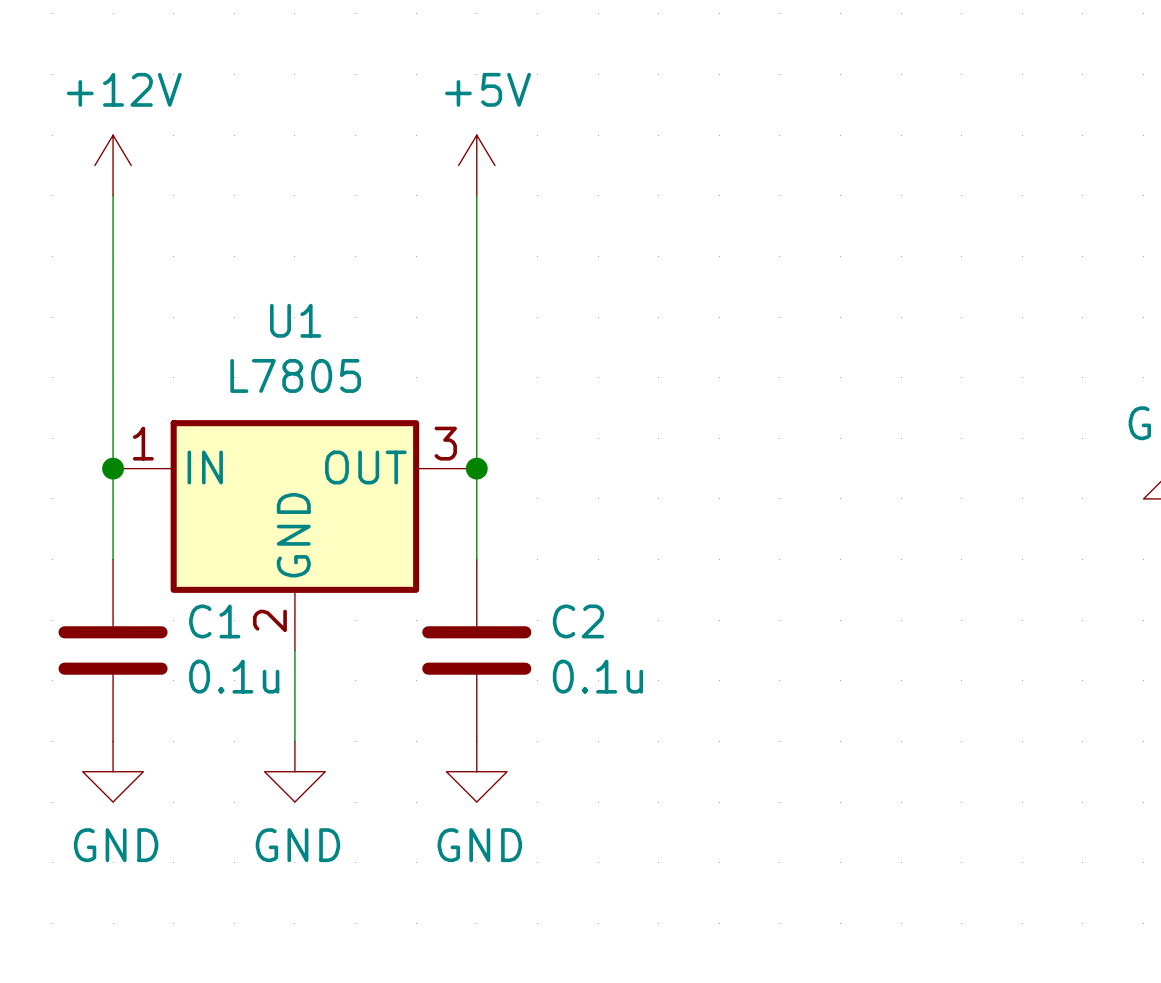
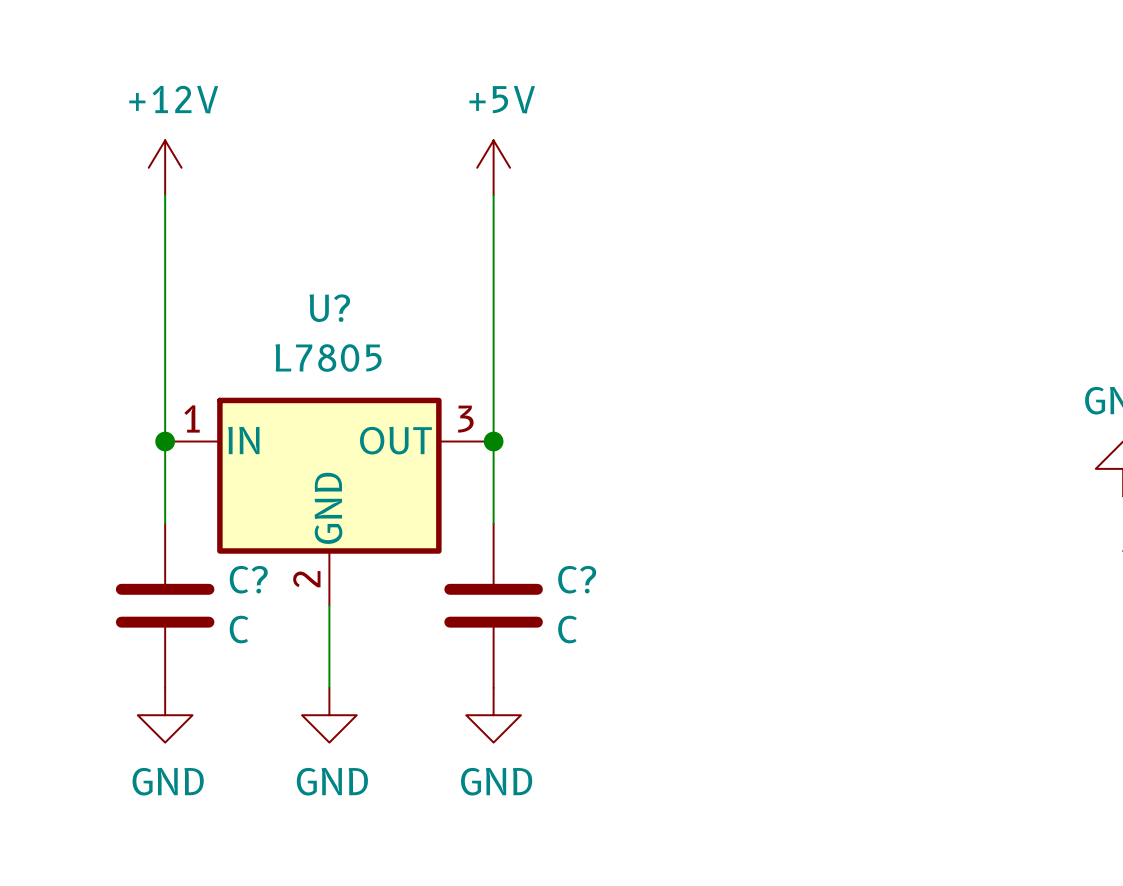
U1 name: U1 (295, 320) -> U? (329, 308)
C1 name: C1 (214, 621) -> C? (248, 579)
C2 name: C2 (578, 621) -> C? (577, 579)
C1 value: 0.1u (234, 676) -> C (239, 629)
C2 value: 0.1u (597, 676) -> C (567, 629)

